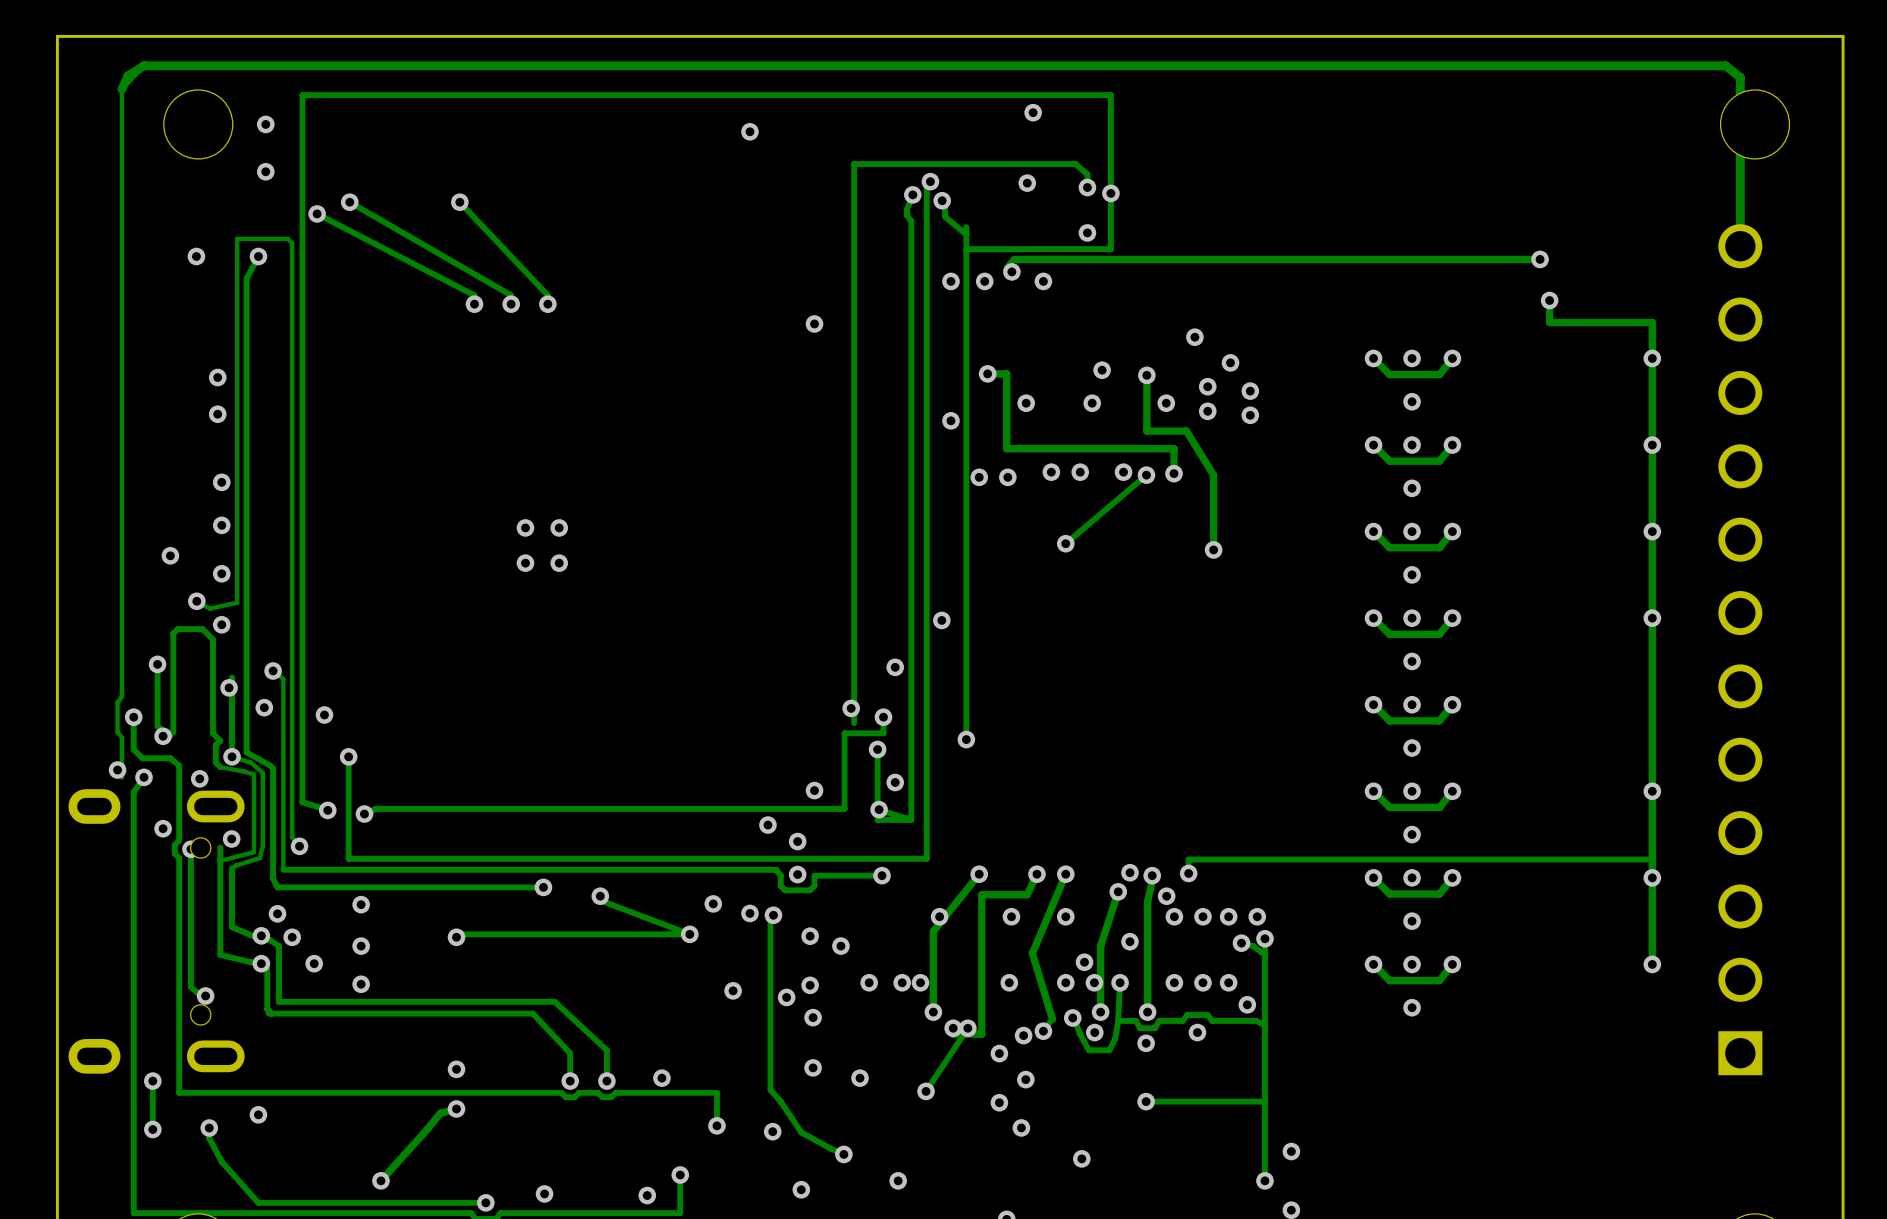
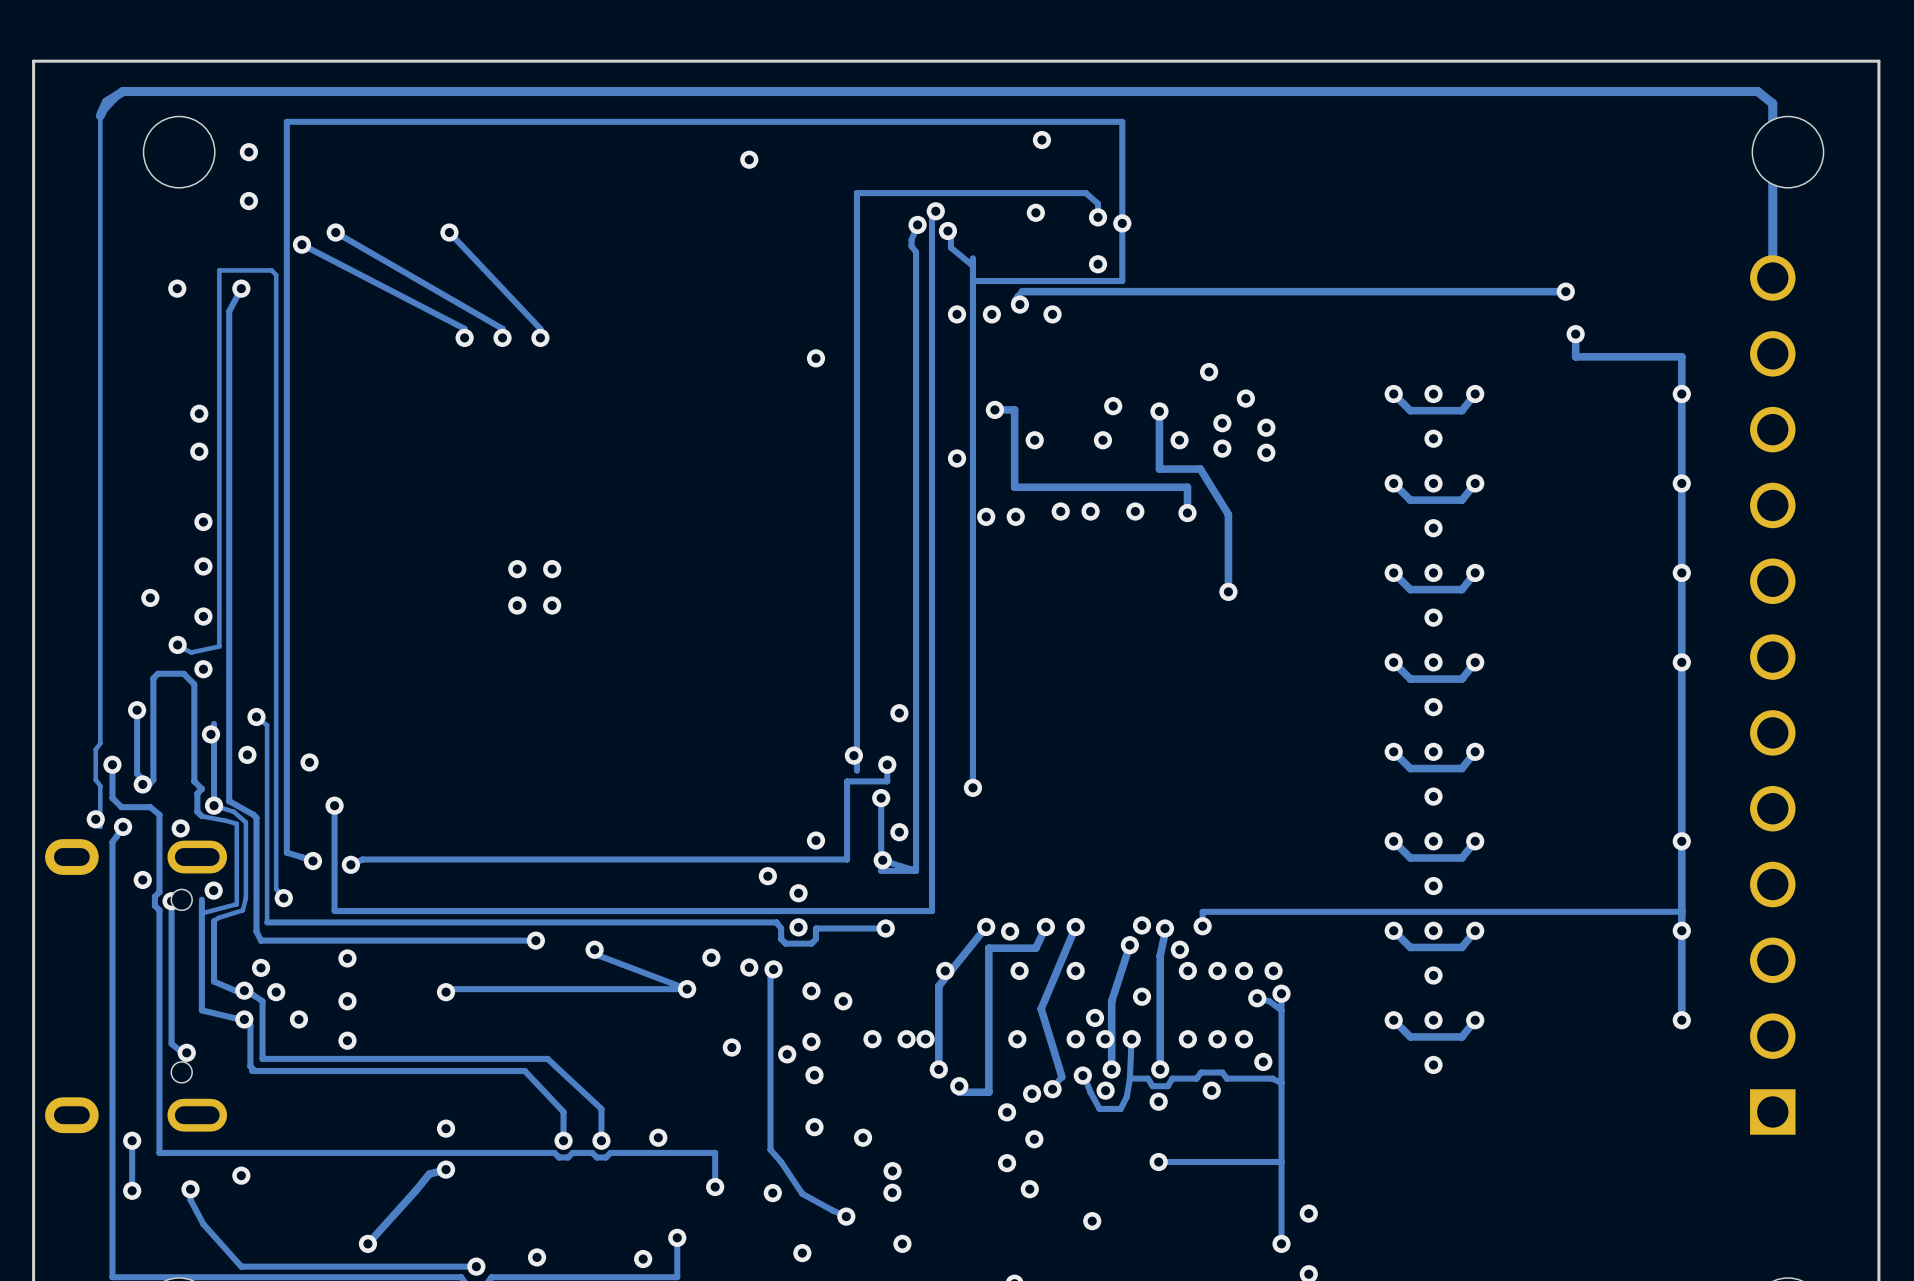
track: (1146, 475) (1065, 543) -> none
via: (1146, 475) -> none
via: (1065, 543) -> none
via: (941, 620) -> none
via: none -> (1010, 931)
track: (967, 1028) (926, 1091) -> none
via: (967, 1028) -> none
via: (926, 1091) -> none
via: none -> (892, 1171)
via: none -> (892, 1192)

